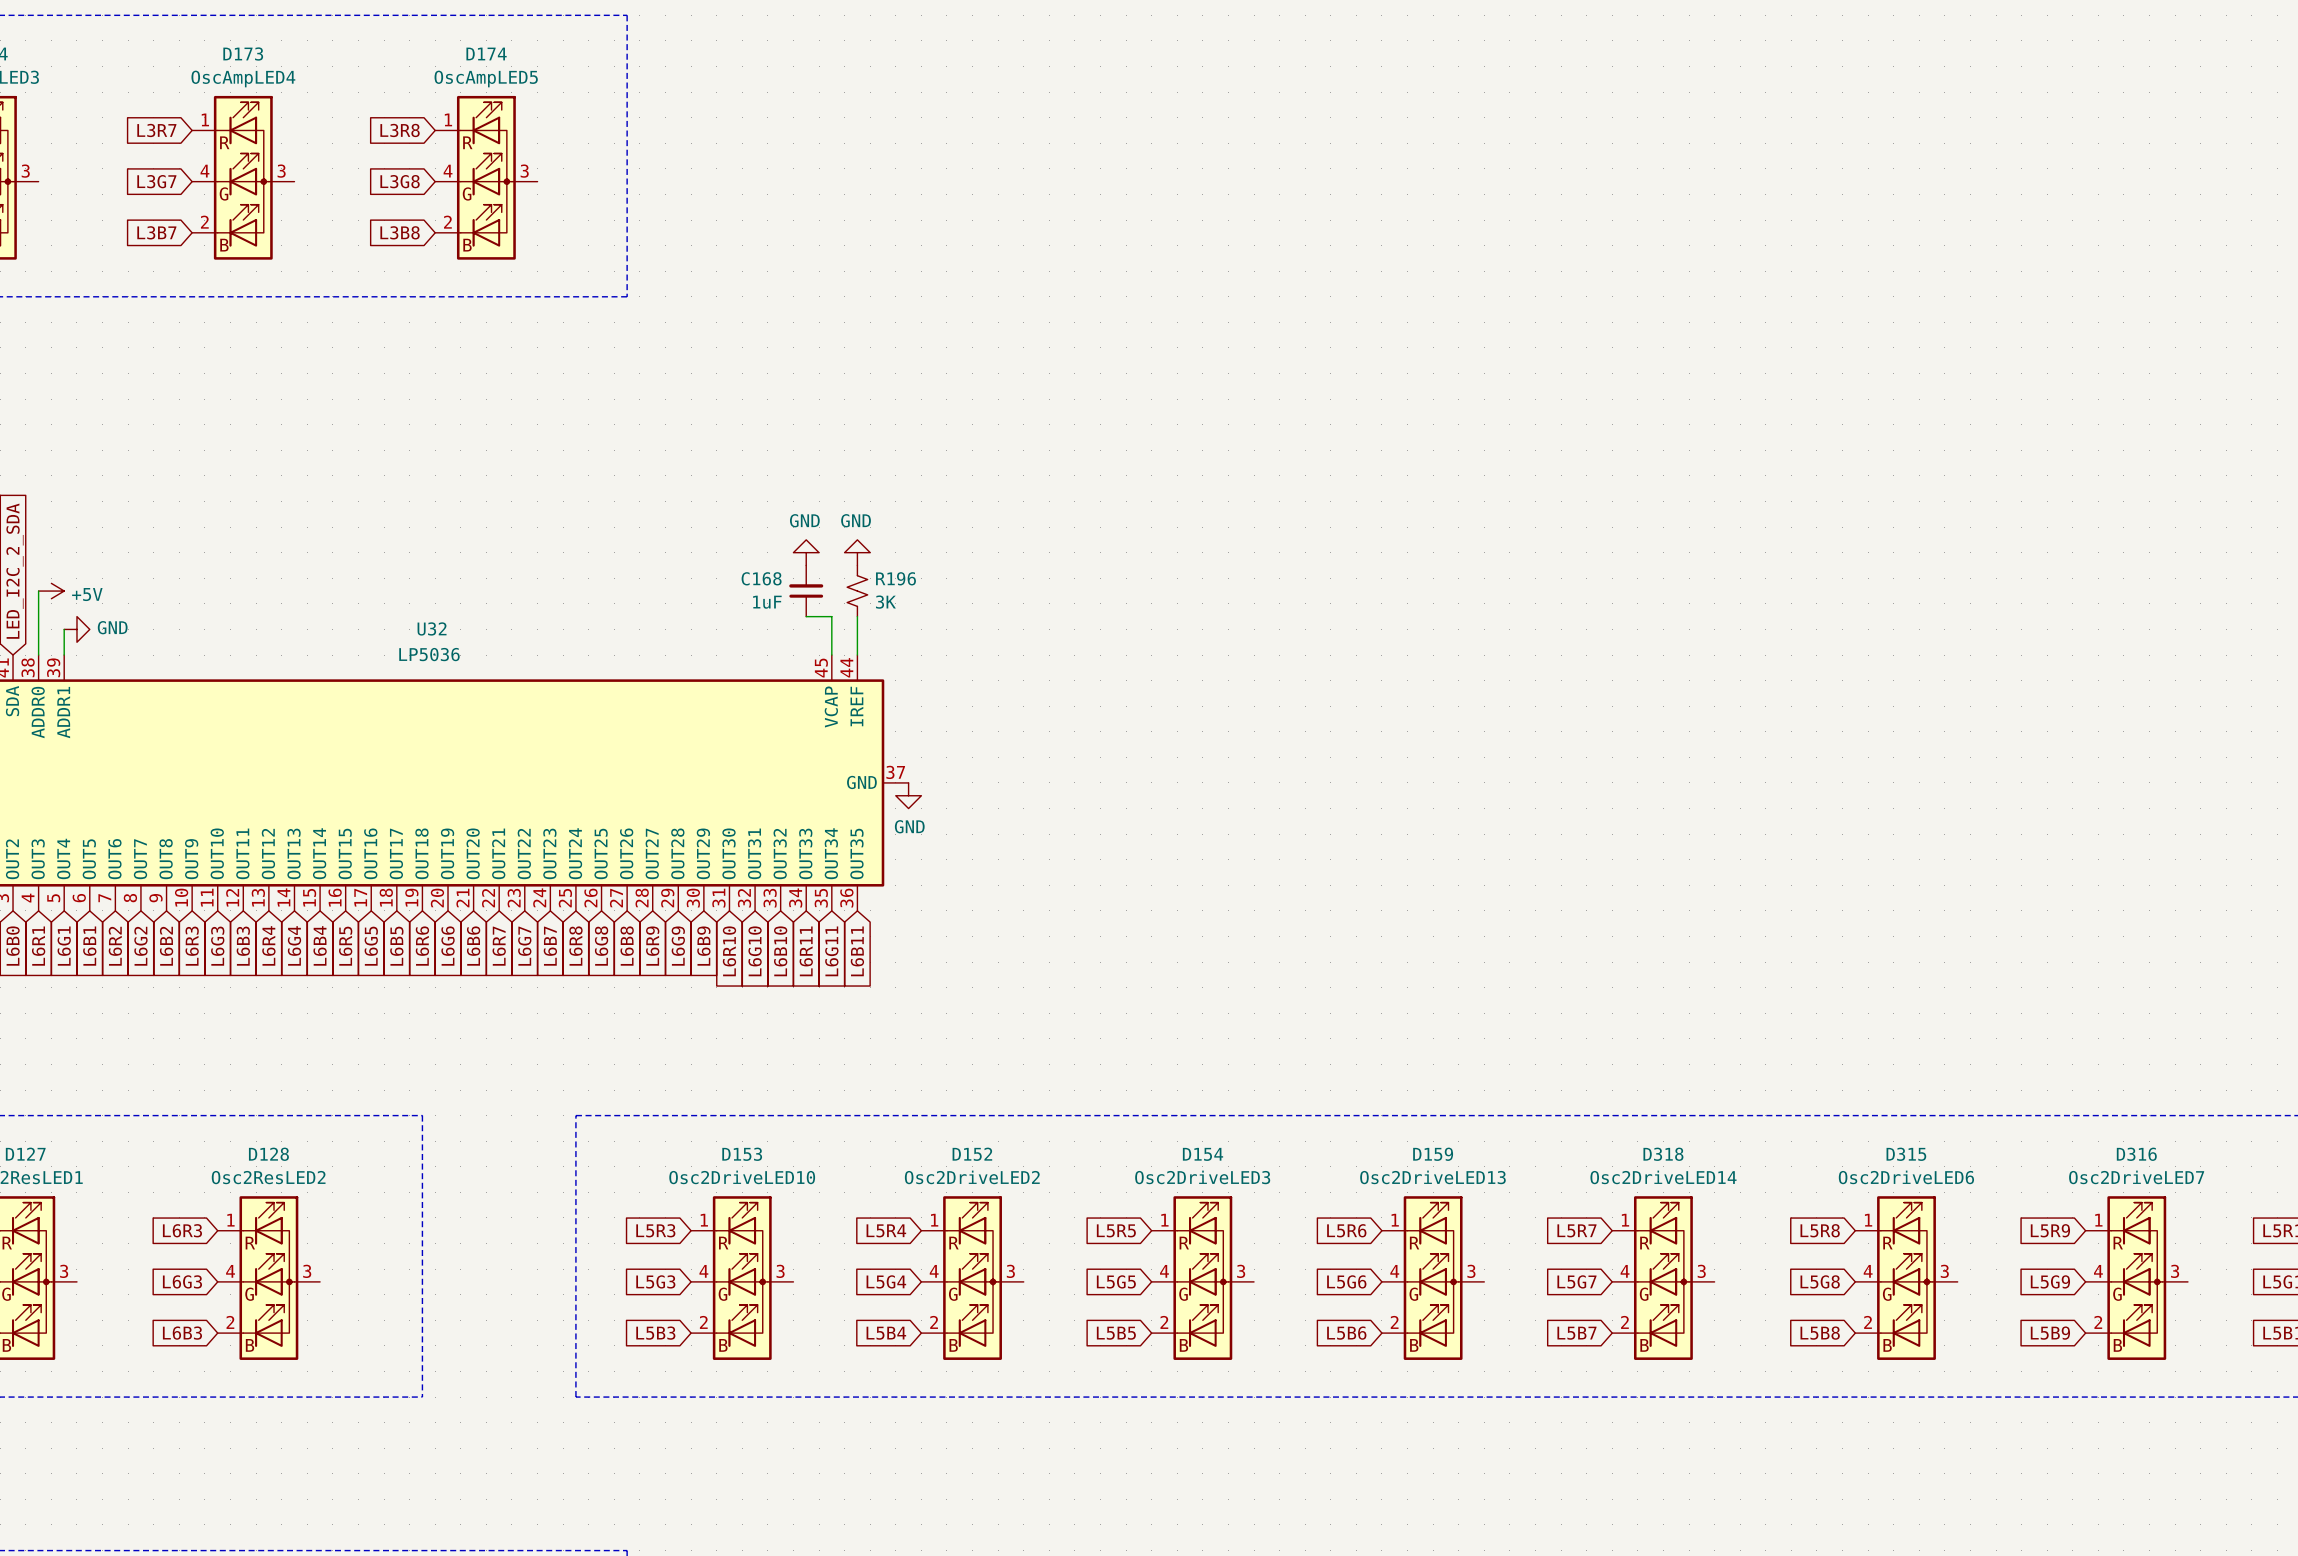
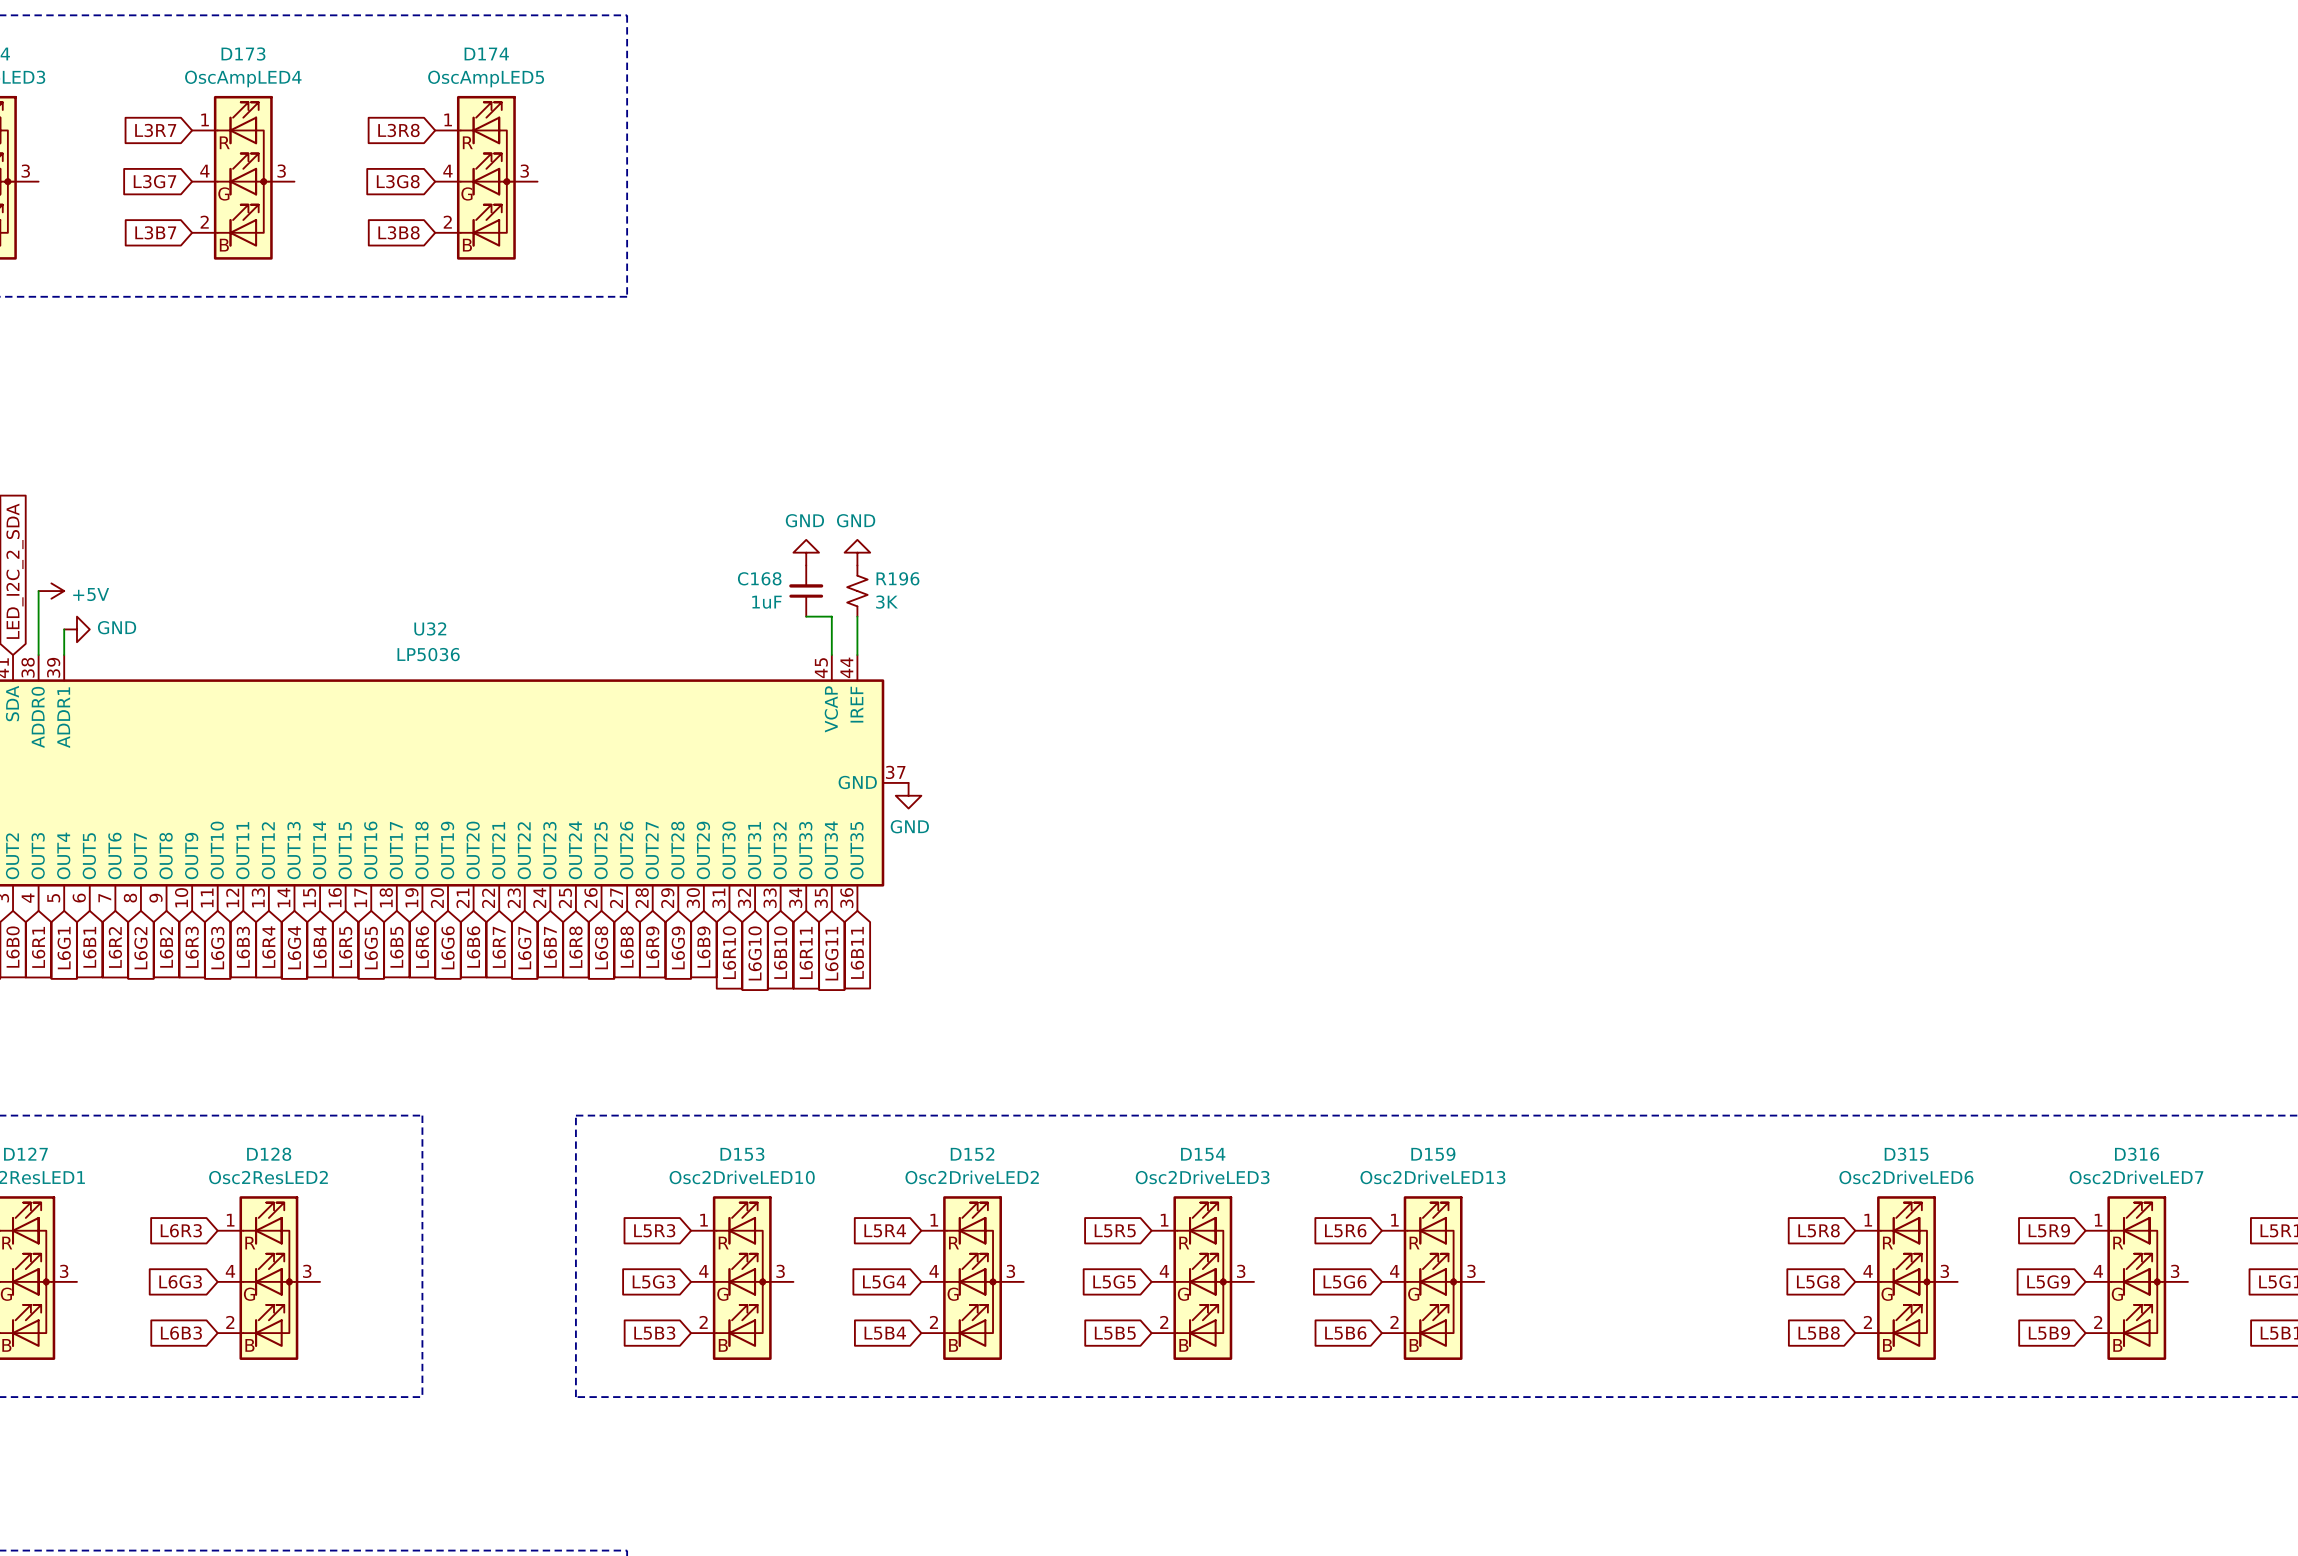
global label: L5R7 (1576, 1230) -> none
D318: Osc2DriveLED14 (1663, 1278) -> none
global label: L5G7 (1576, 1281) -> none
global label: L5B7 (1576, 1333) -> none

